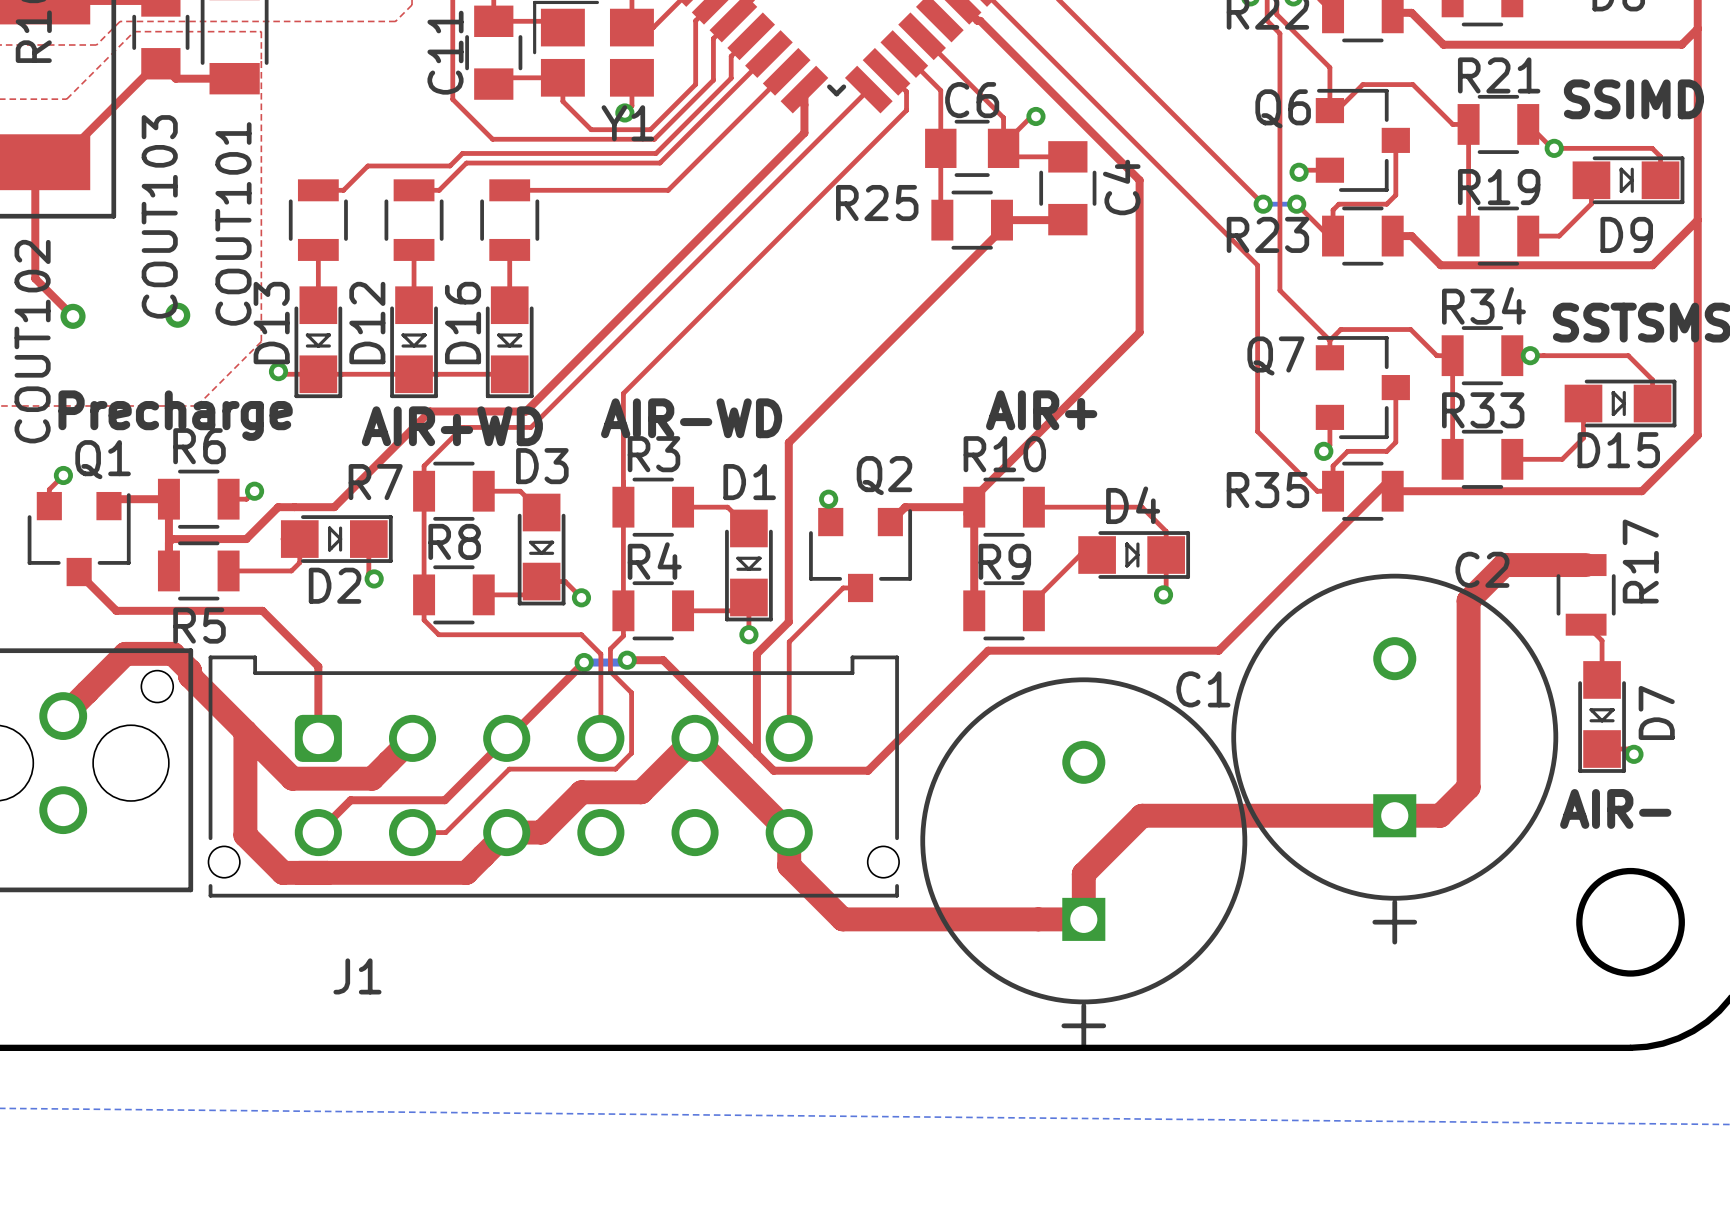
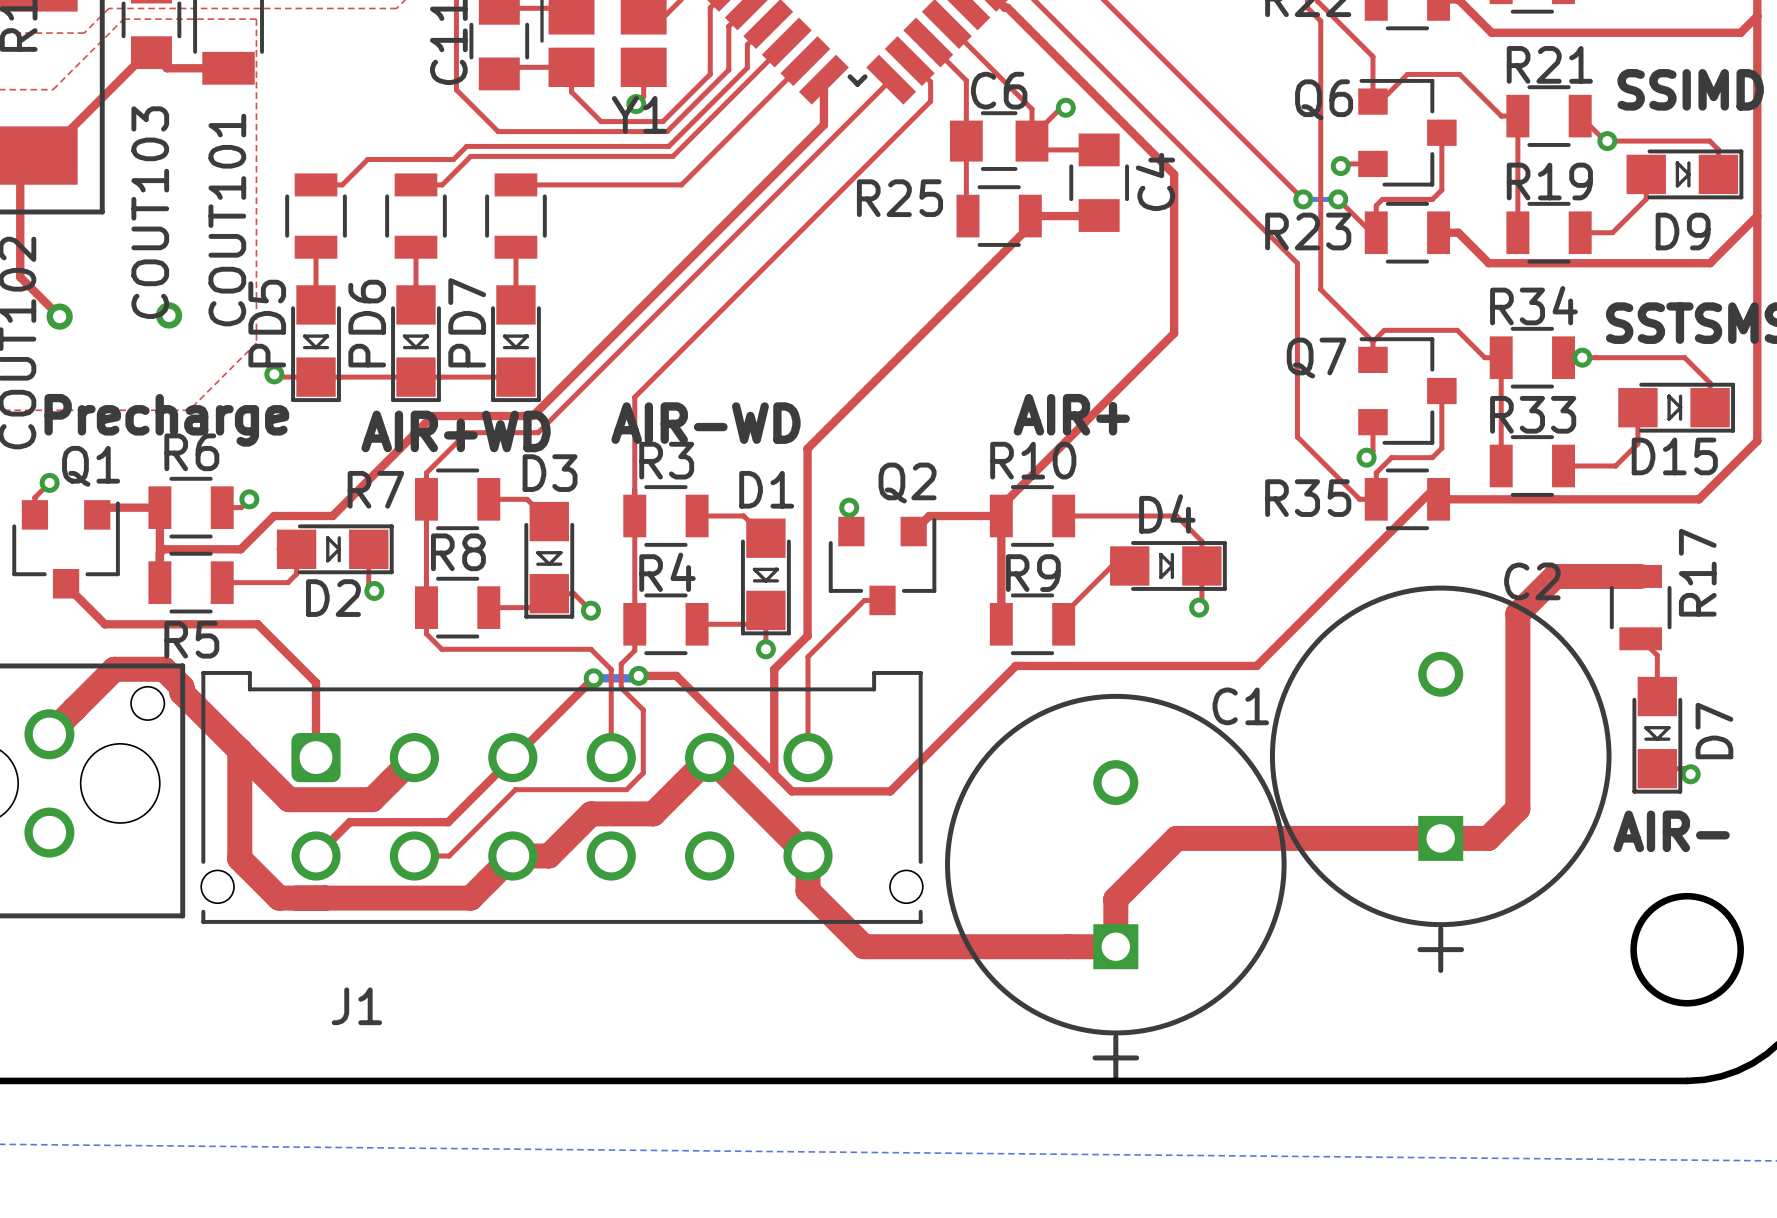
D13 name: D13 (271, 323) -> PD5 (267, 323)
D12 name: D12 (367, 323) -> PD6 (367, 323)
D16 name: D16 (463, 323) -> PD7 (467, 322)

